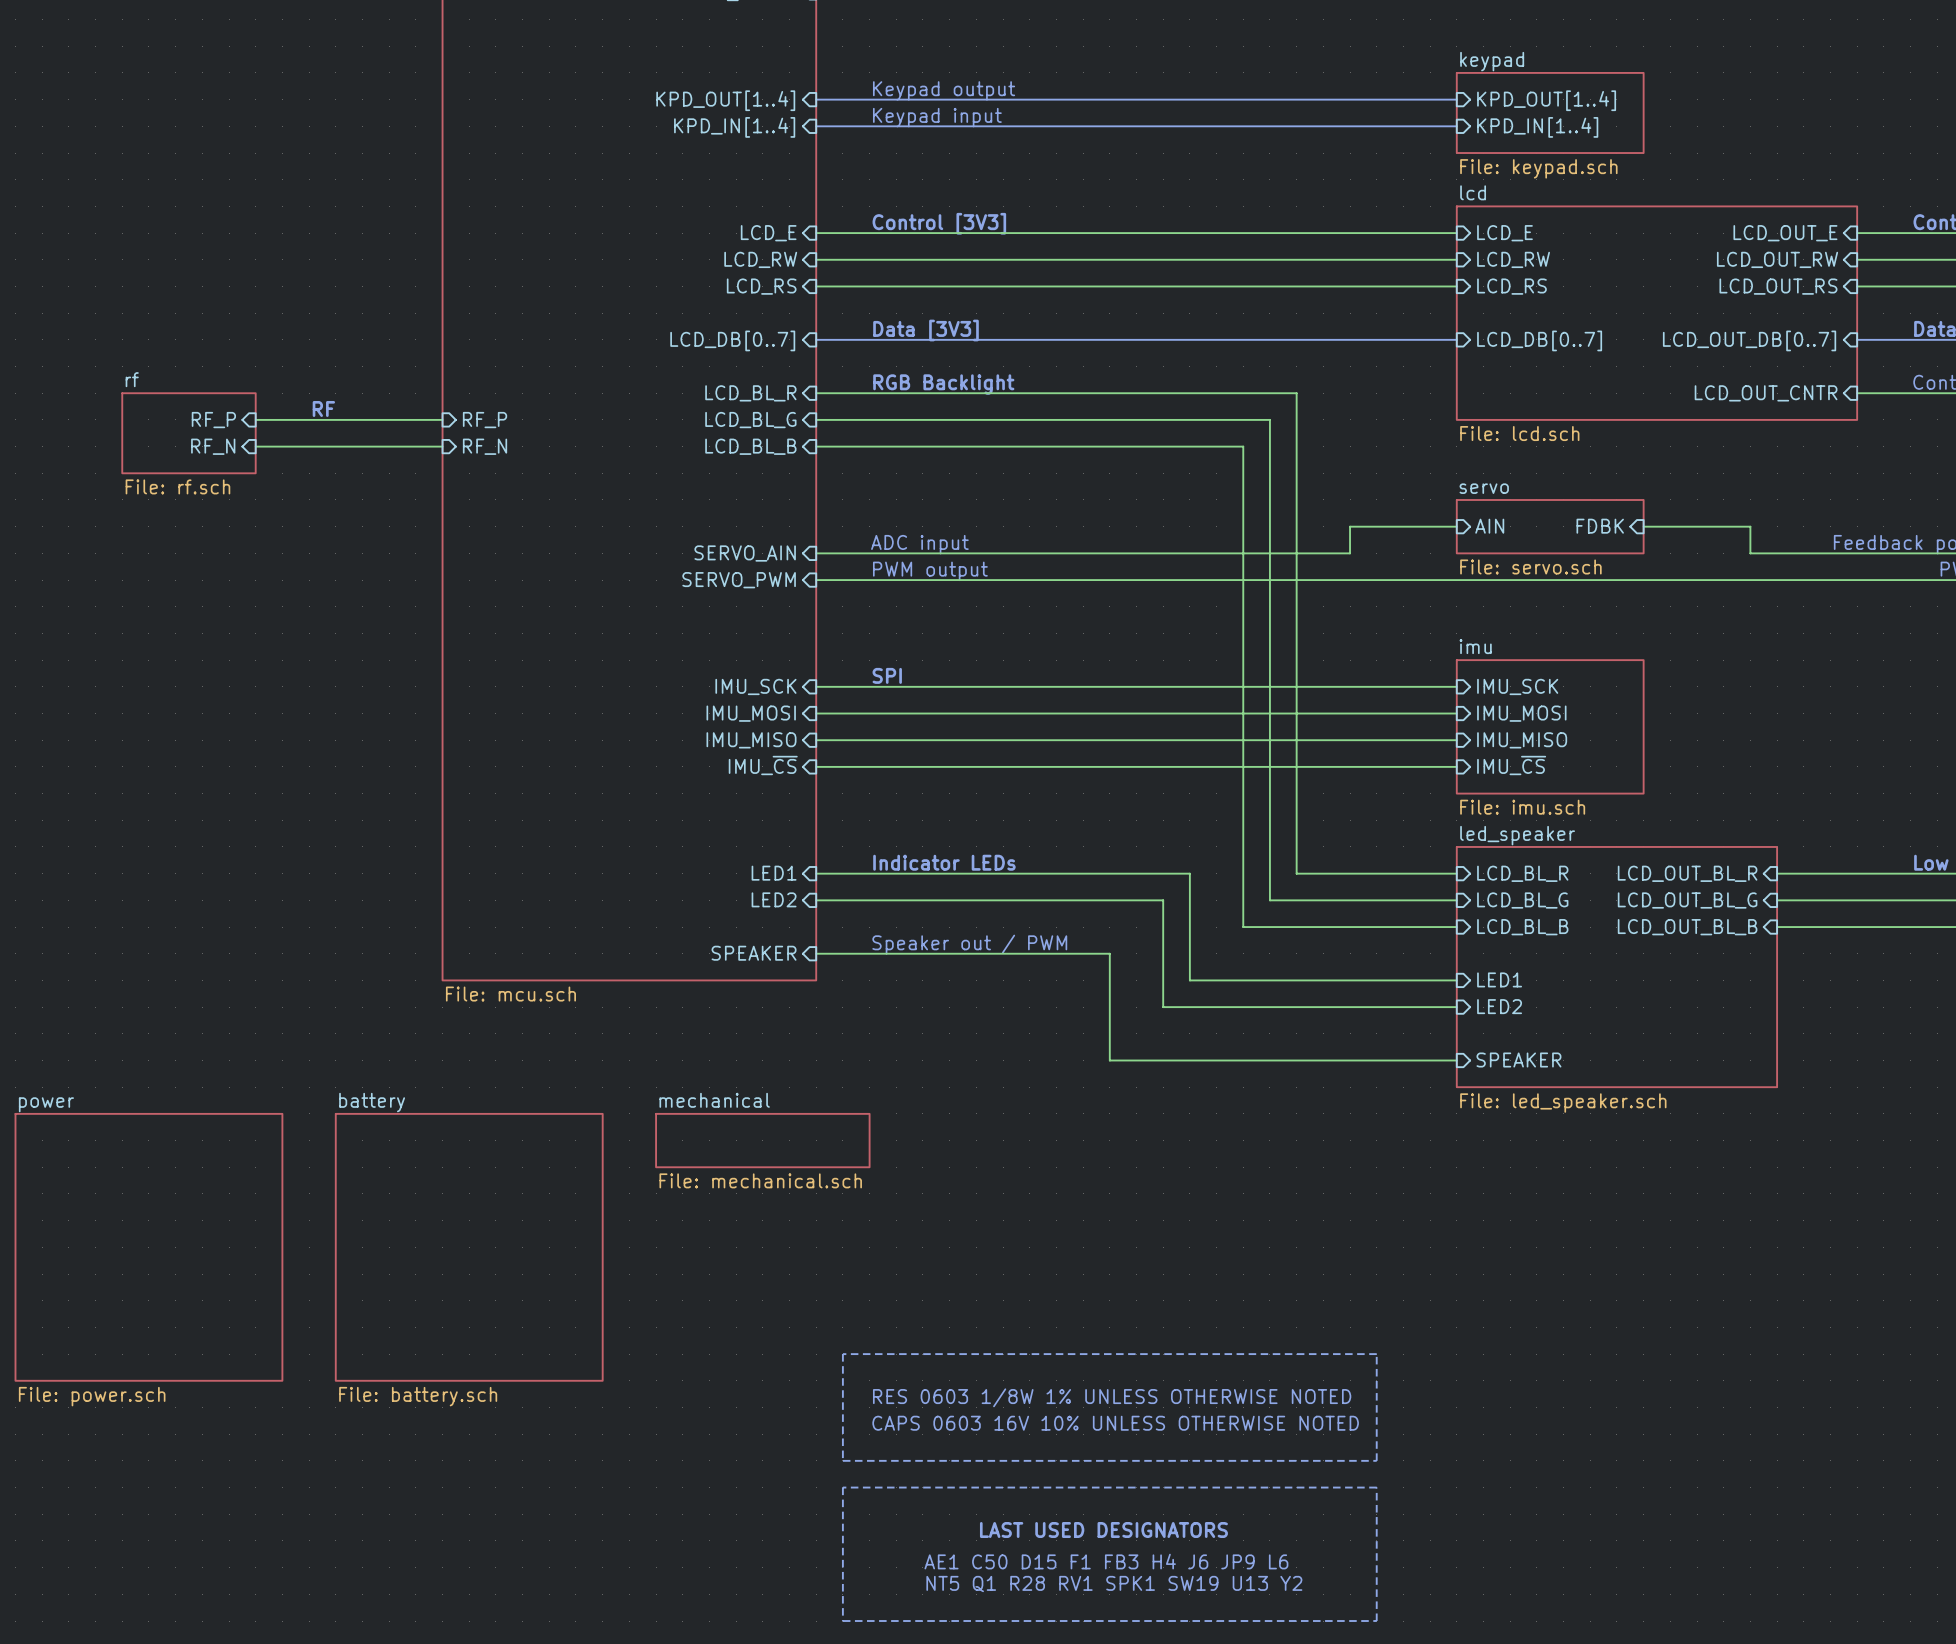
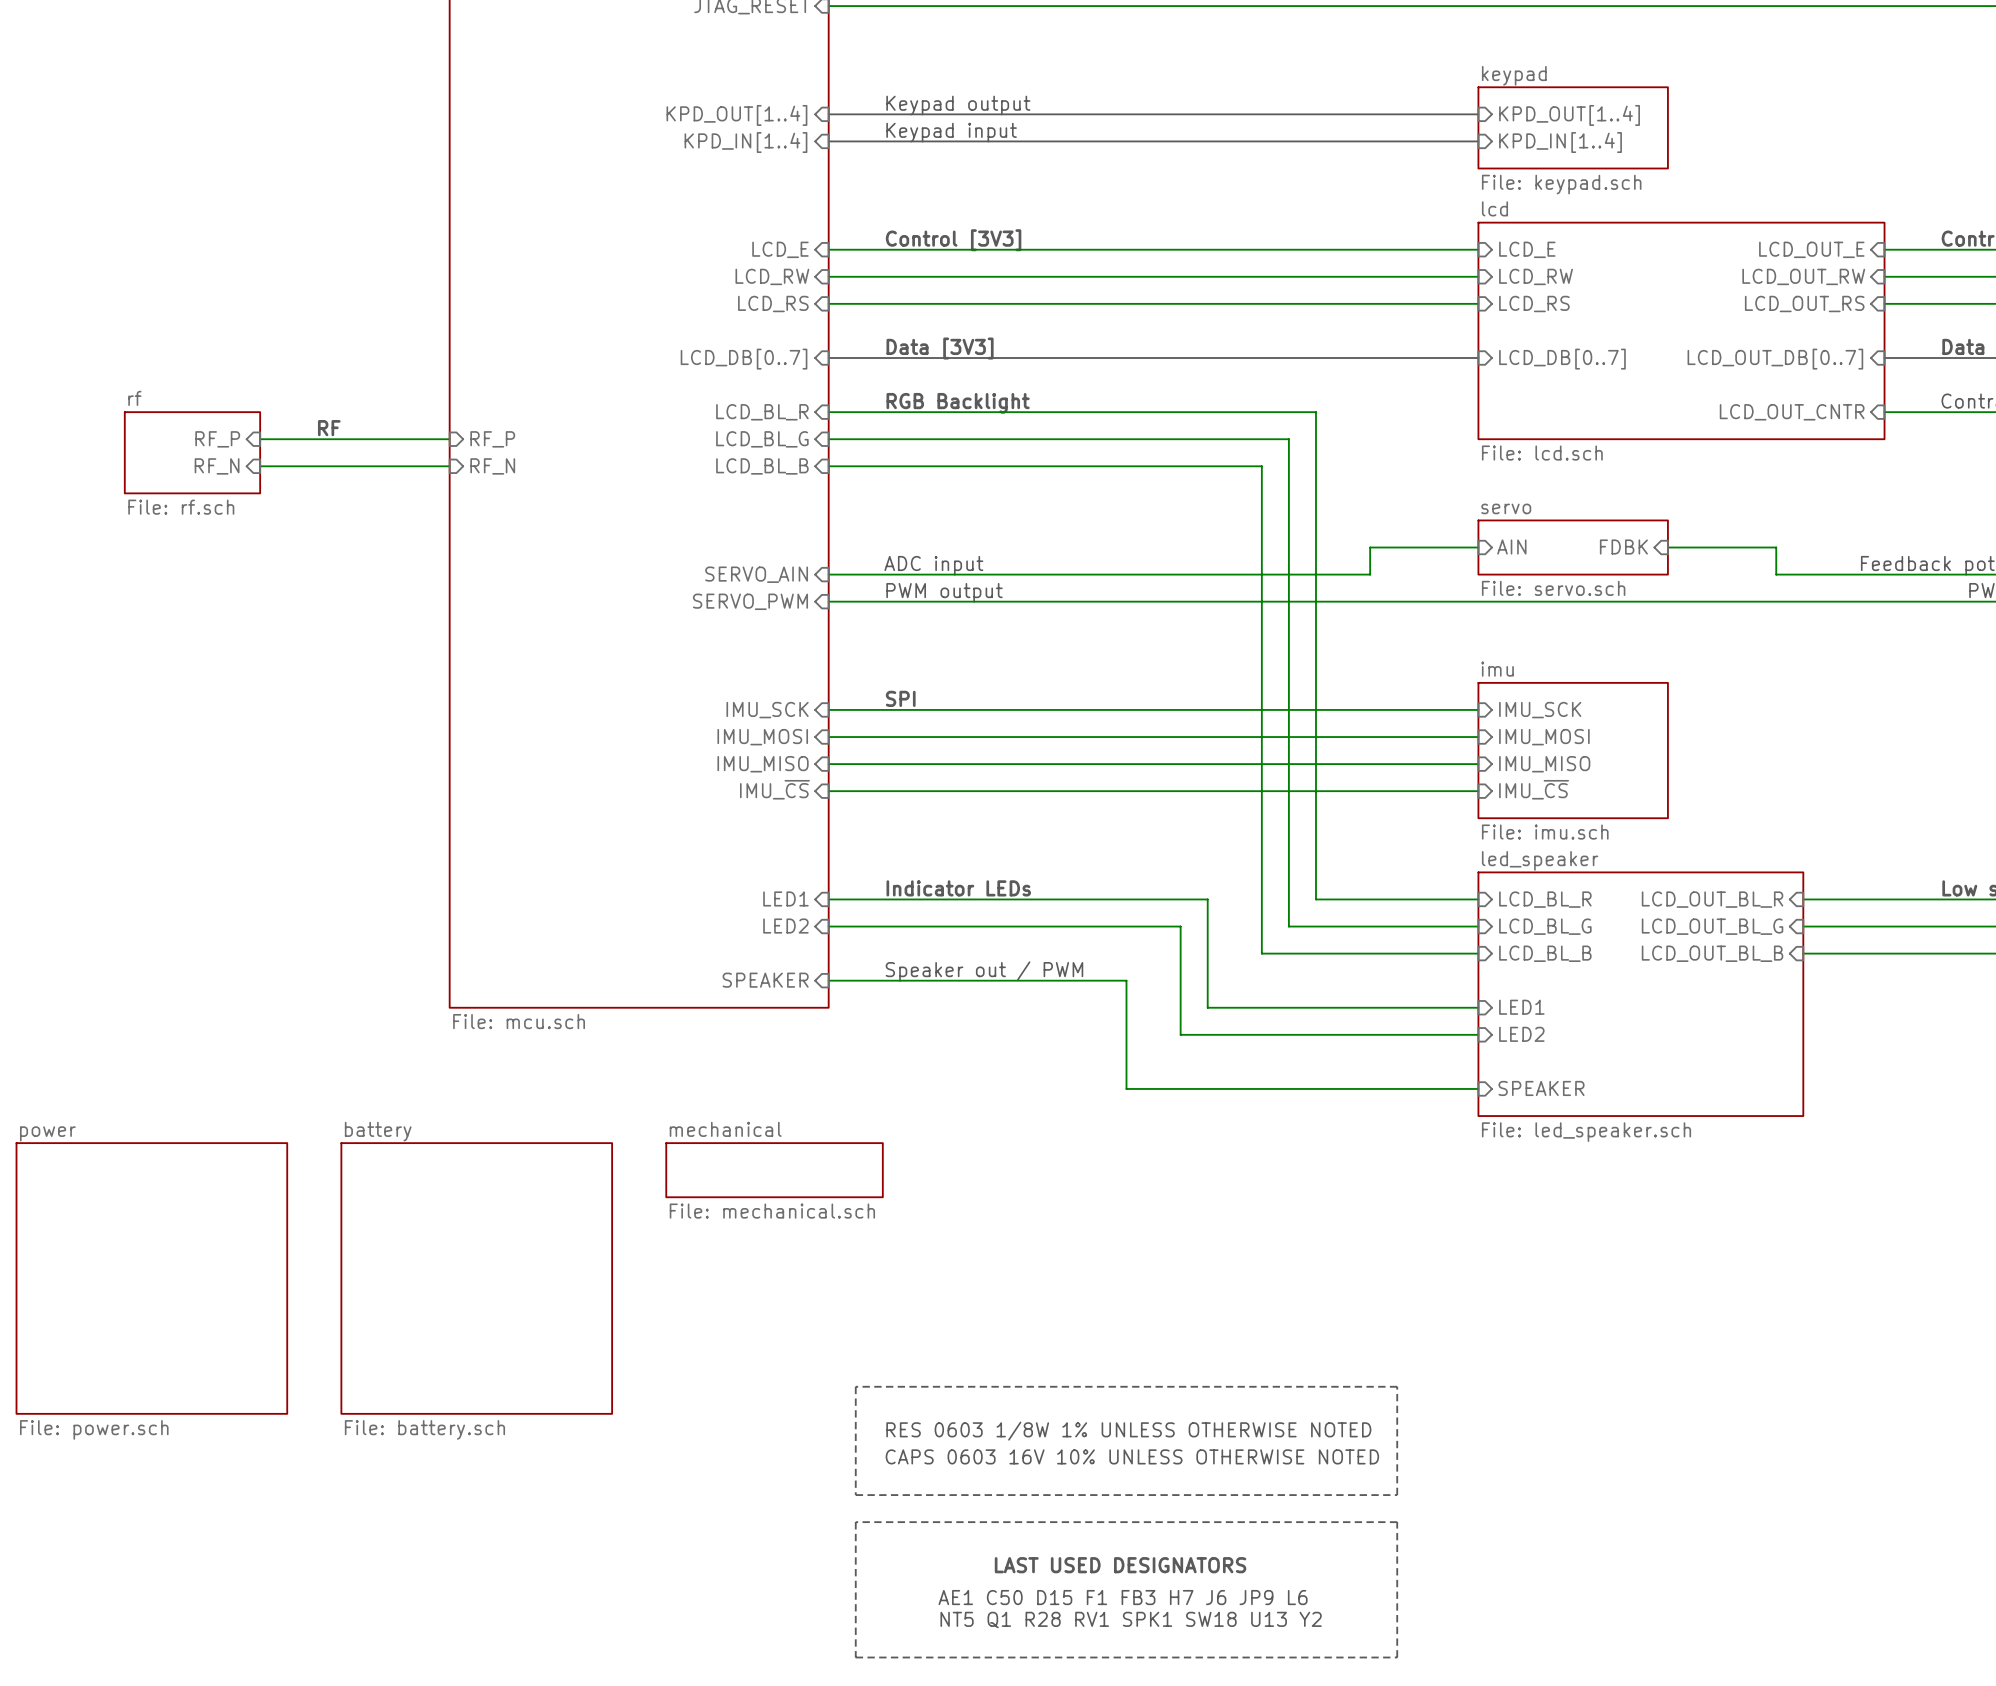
text: AE1 C50 D15 F1 FB3 H4 J6 JP9 L6 (1106, 1561) -> AE1 C50 D15 F1 FB3 H7 J6 JP9 L6 (1123, 1597)
text: NT5 Q1 R28 RV1 SPK1 SW19 U13 Y2 (1114, 1584) -> NT5 Q1 R28 RV1 SPK1 SW18 U13 Y2 (1131, 1619)

